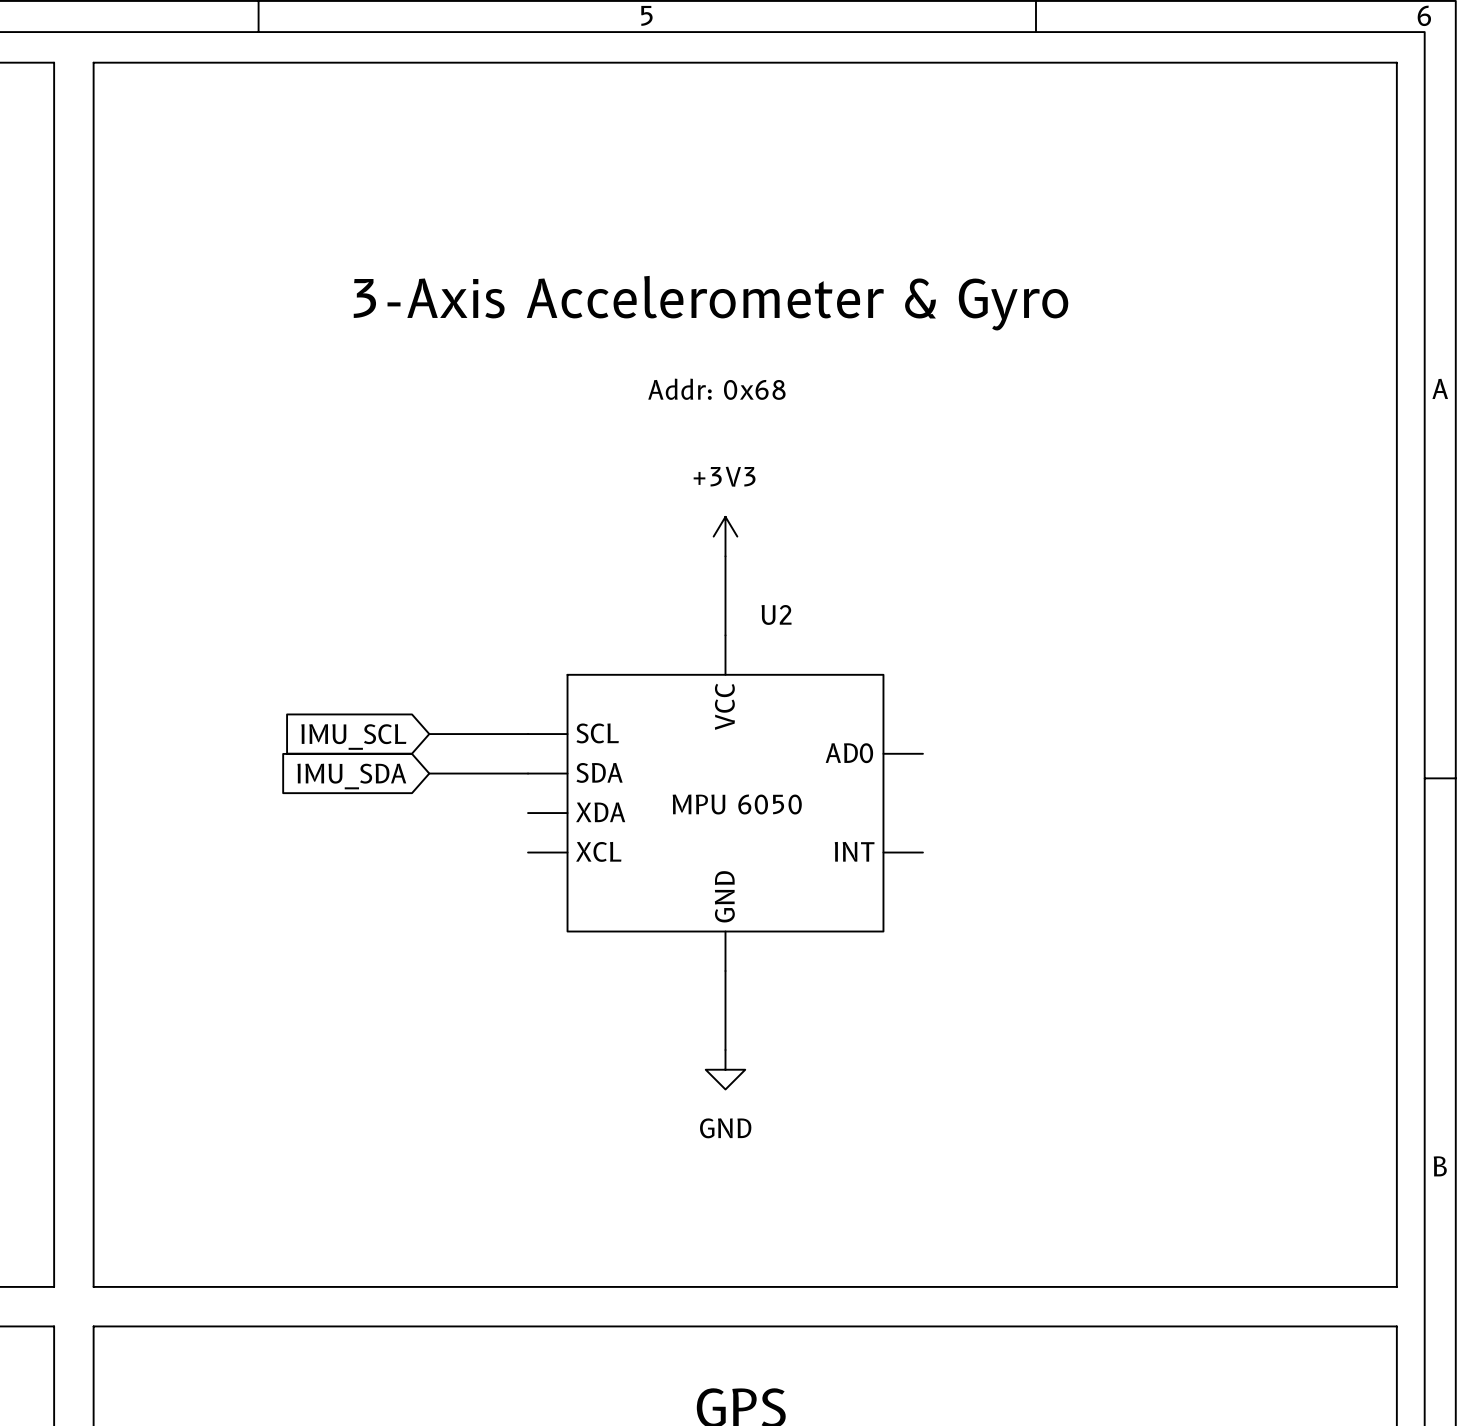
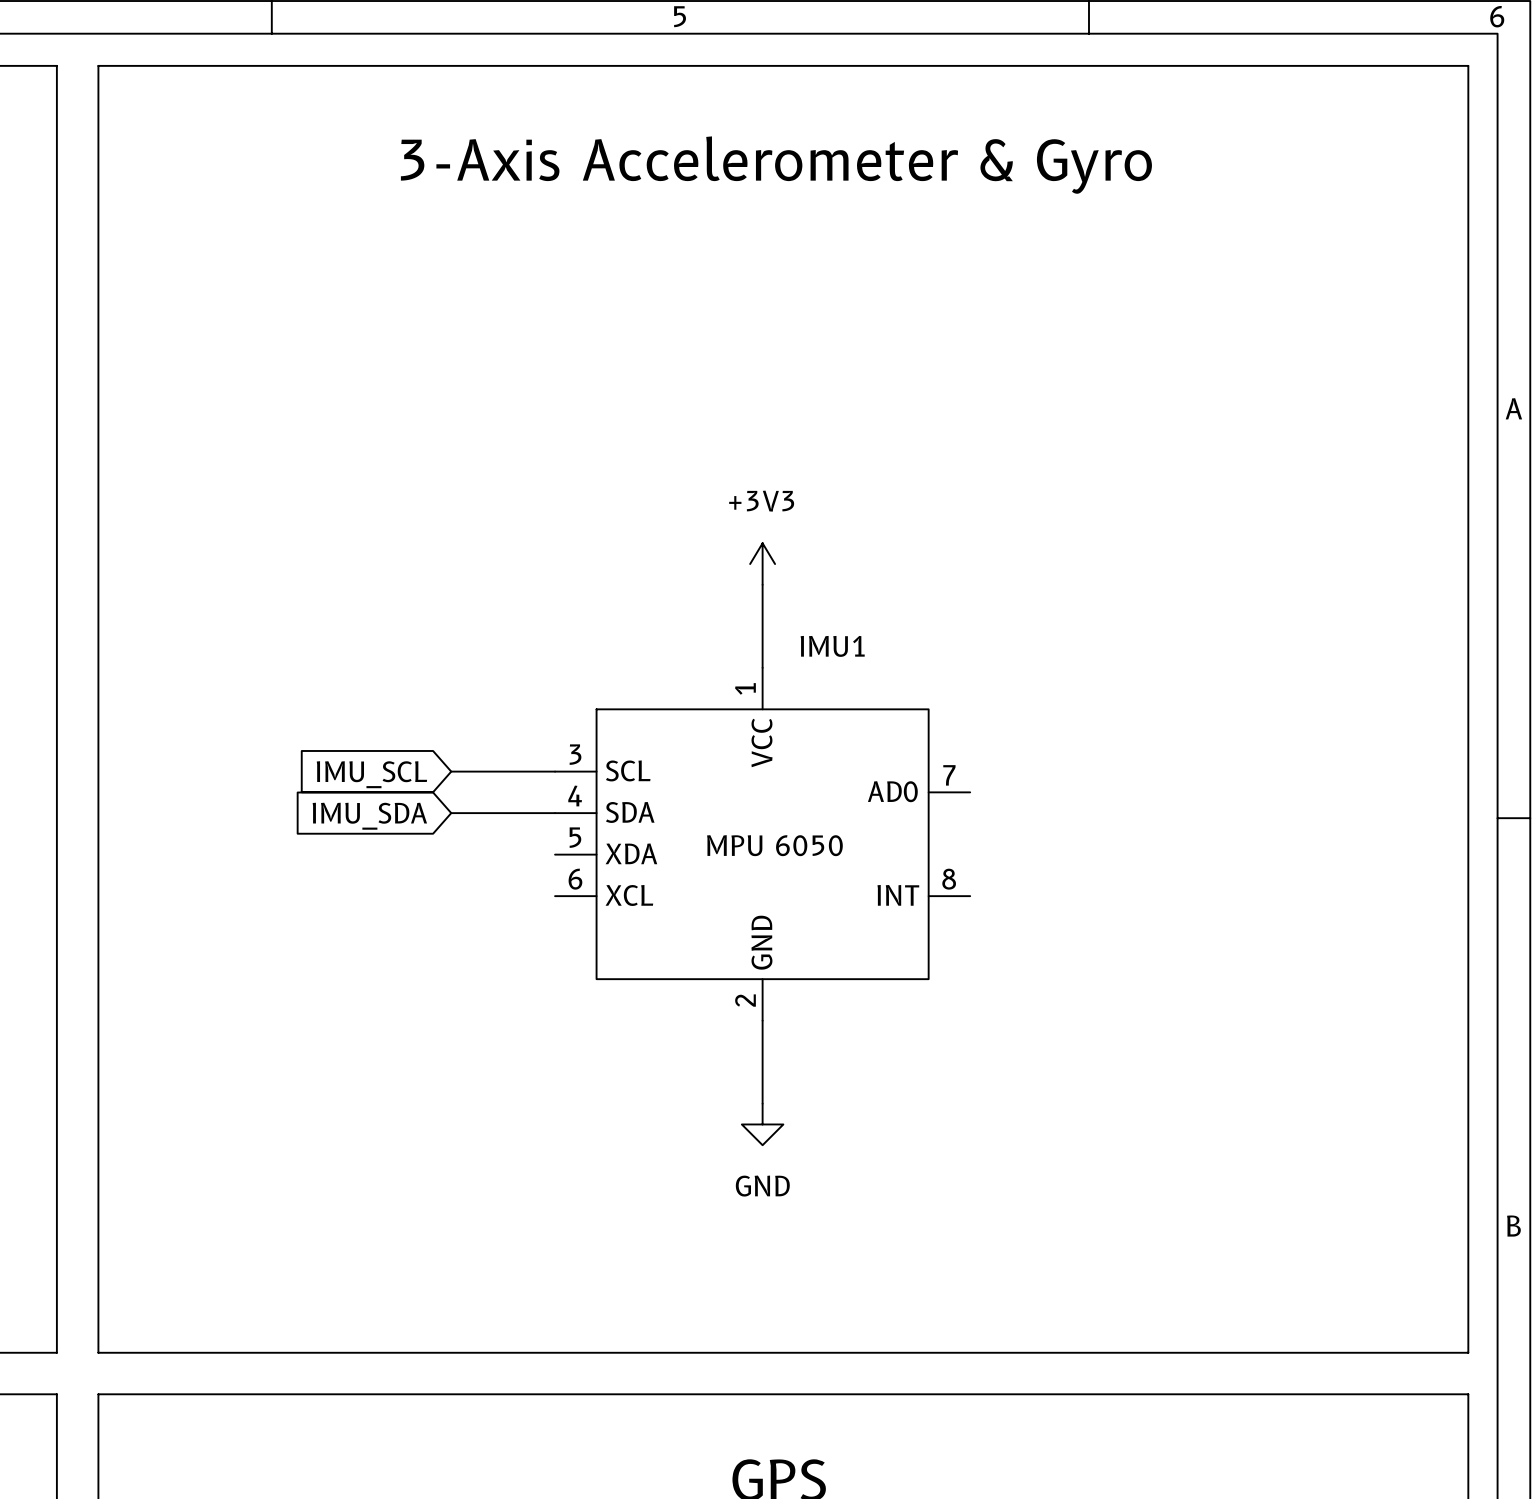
text position: 3-Axis Accelerometer & Gyro (711, 303) -> 3-Axis Accelerometer & Gyro (776, 165)
text: Addr: 0x68 (716, 389) -> none
U2 name: U2 (776, 614) -> IMU1 (832, 646)
U2 pin number: none -> 1 (745, 688)
U2 pin number: none -> 3 (575, 754)
U2 pin number: none -> 7 (949, 775)
U2 pin number: none -> 4 (575, 795)
U2 pin number: none -> 5 (575, 837)
U2 pin number: none -> 6 (575, 879)
U2 pin number: none -> 8 (949, 879)
U2 pin number: none -> 2 (745, 1000)

